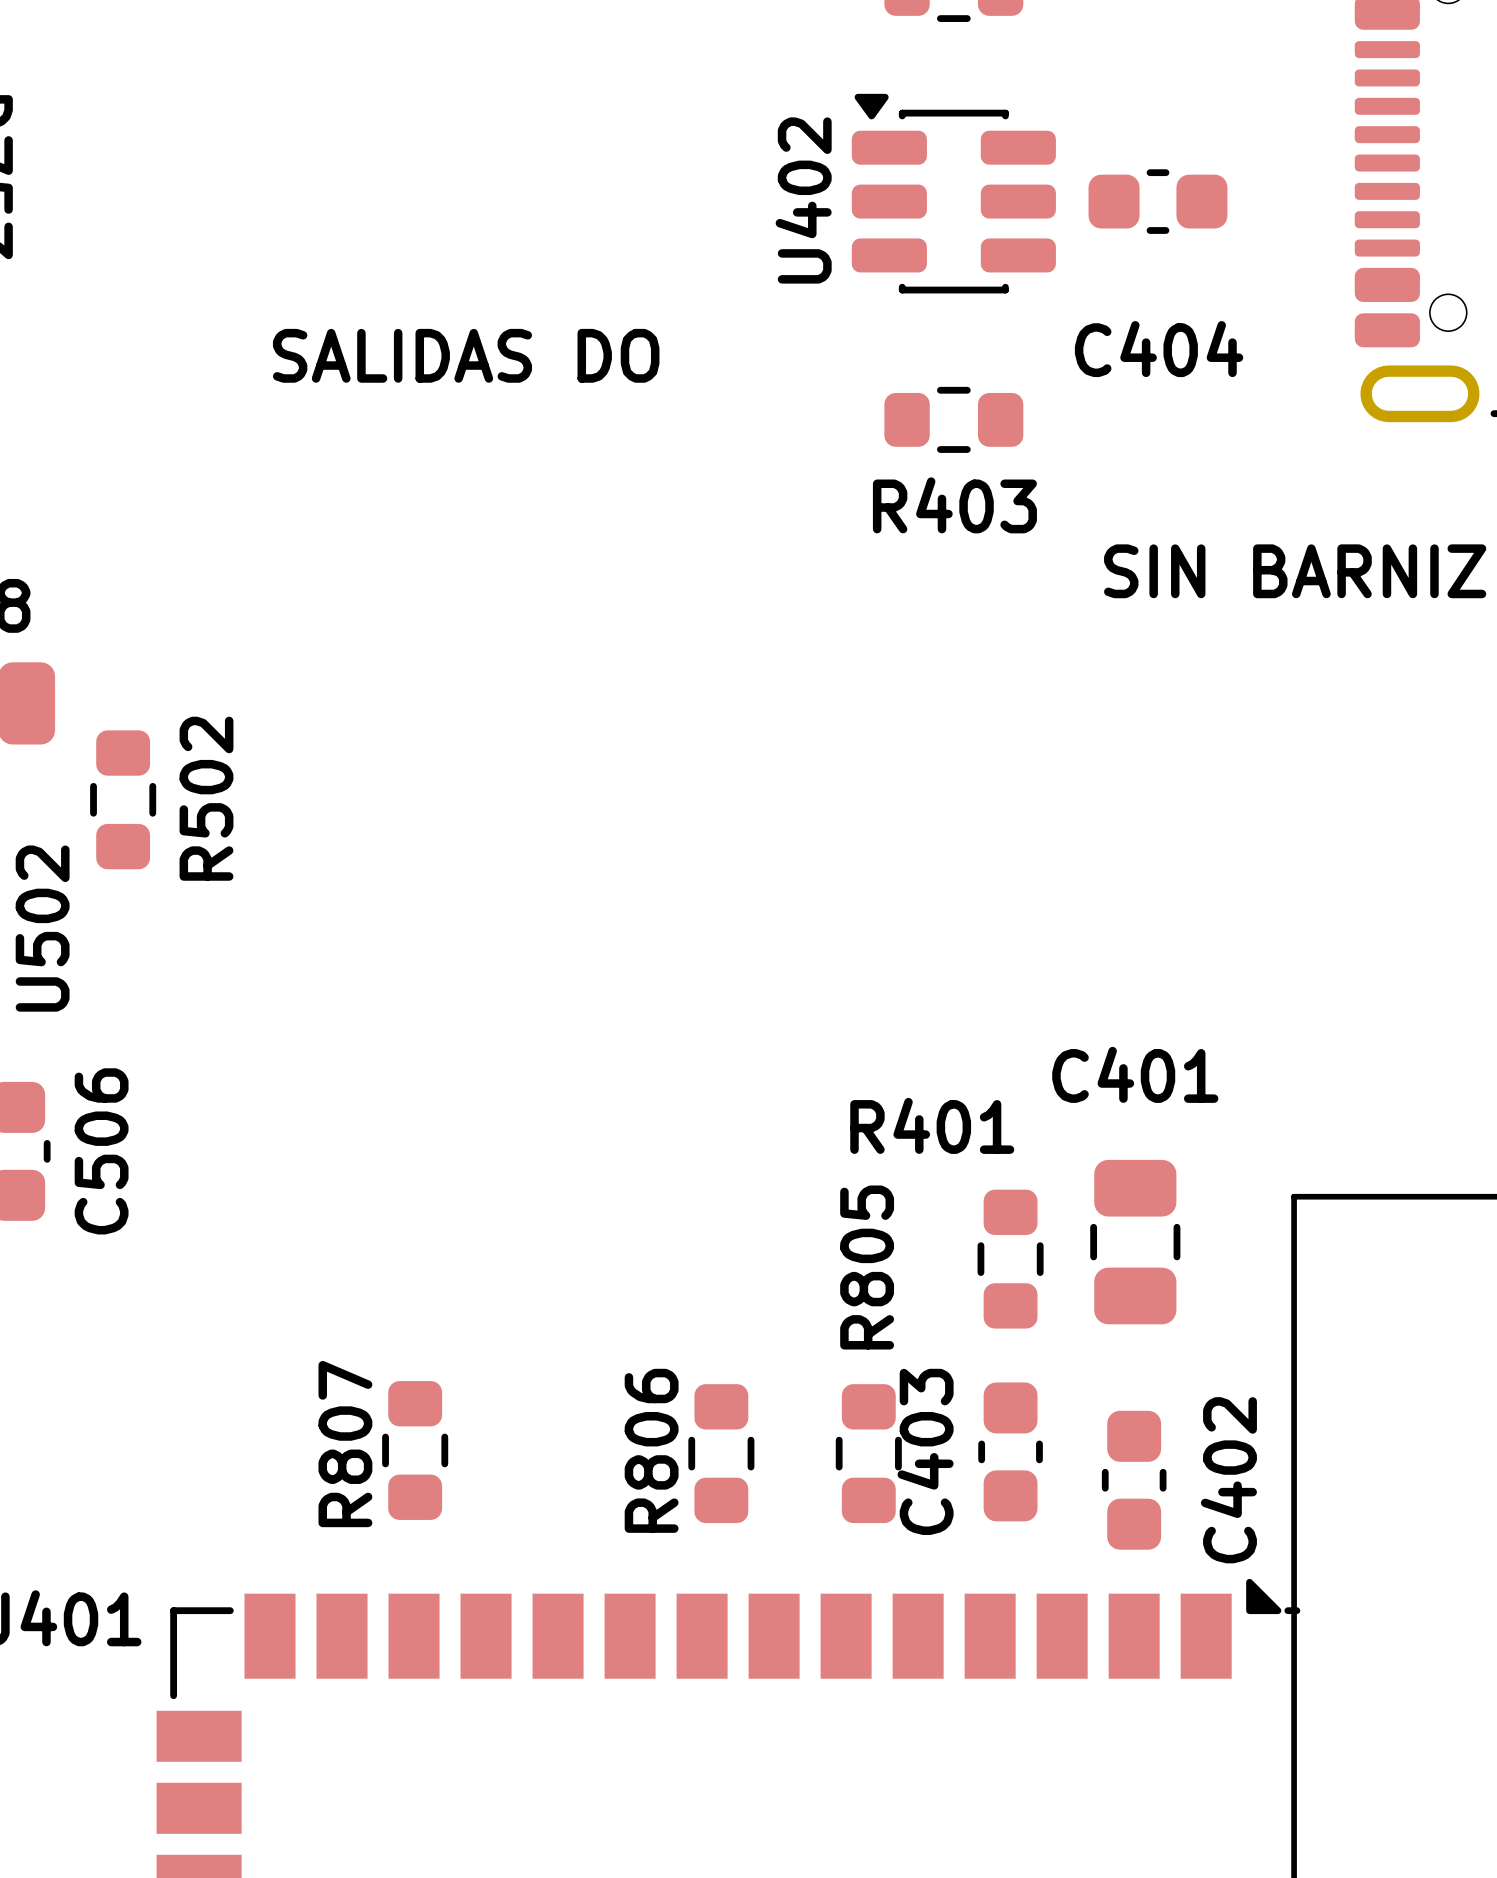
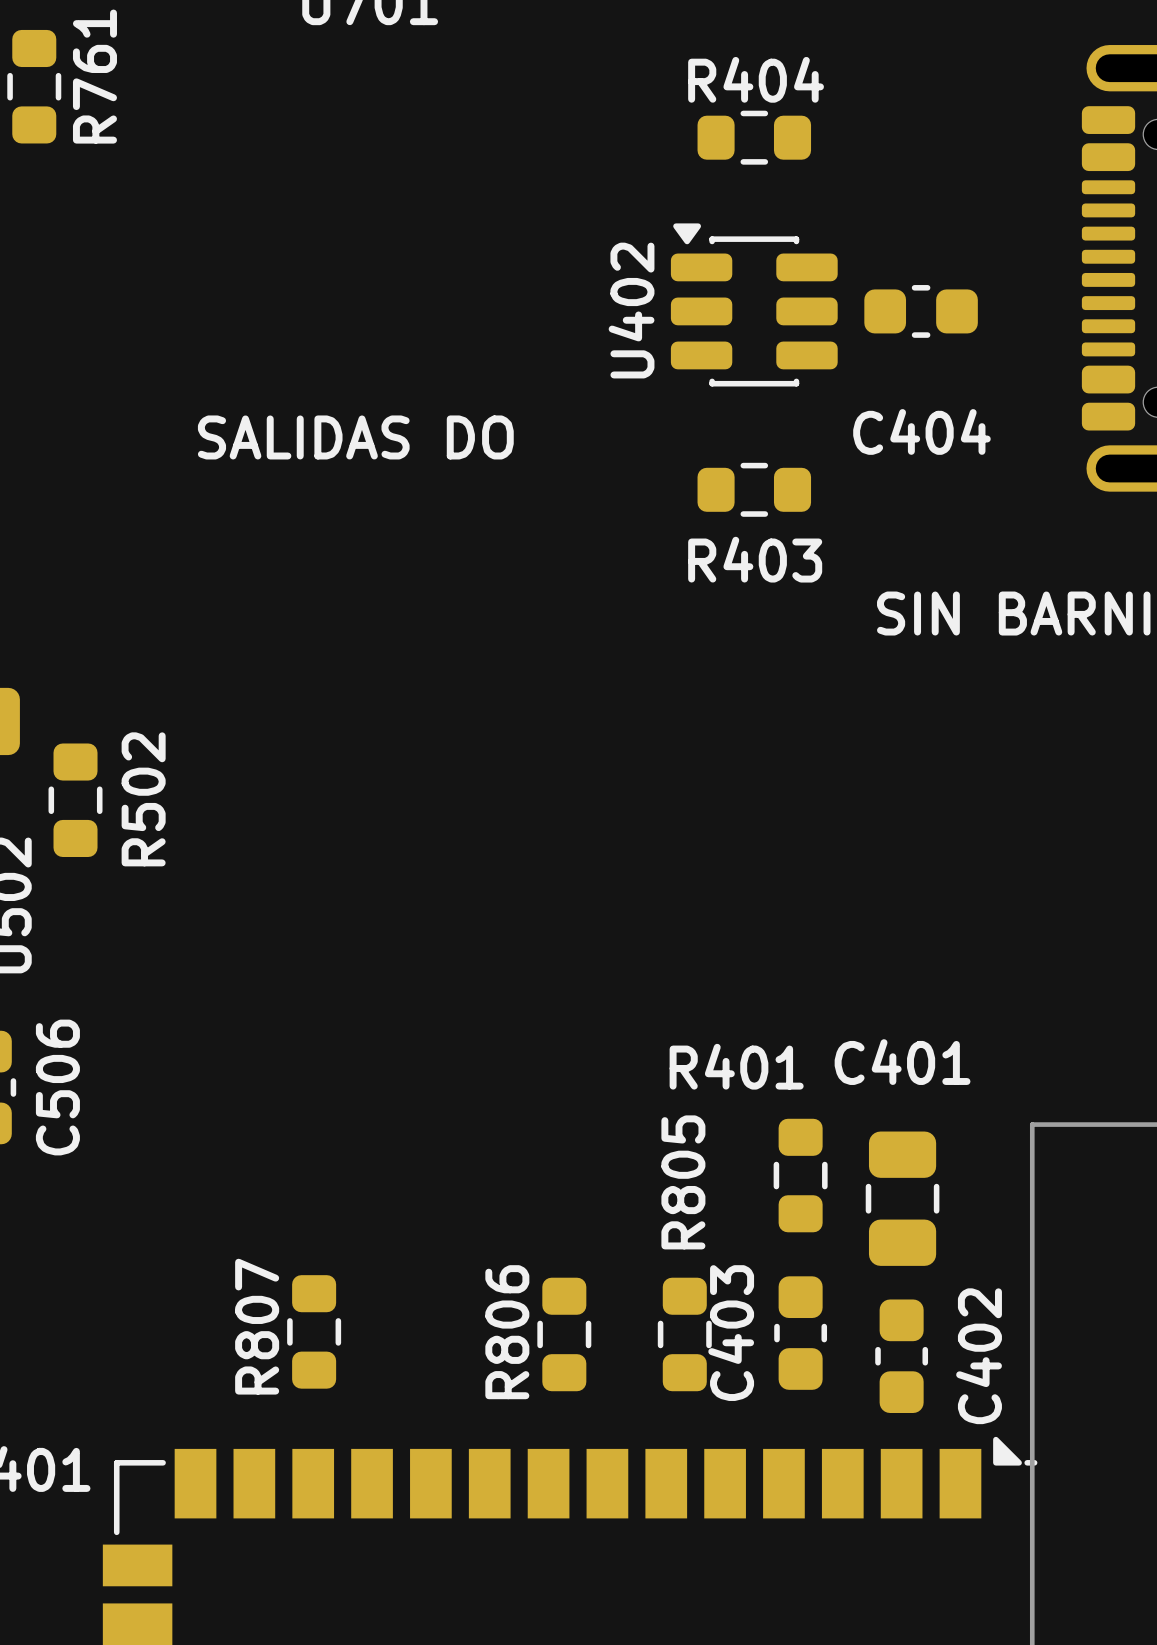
C401 position: (1135, 1242) -> (902, 1198)

